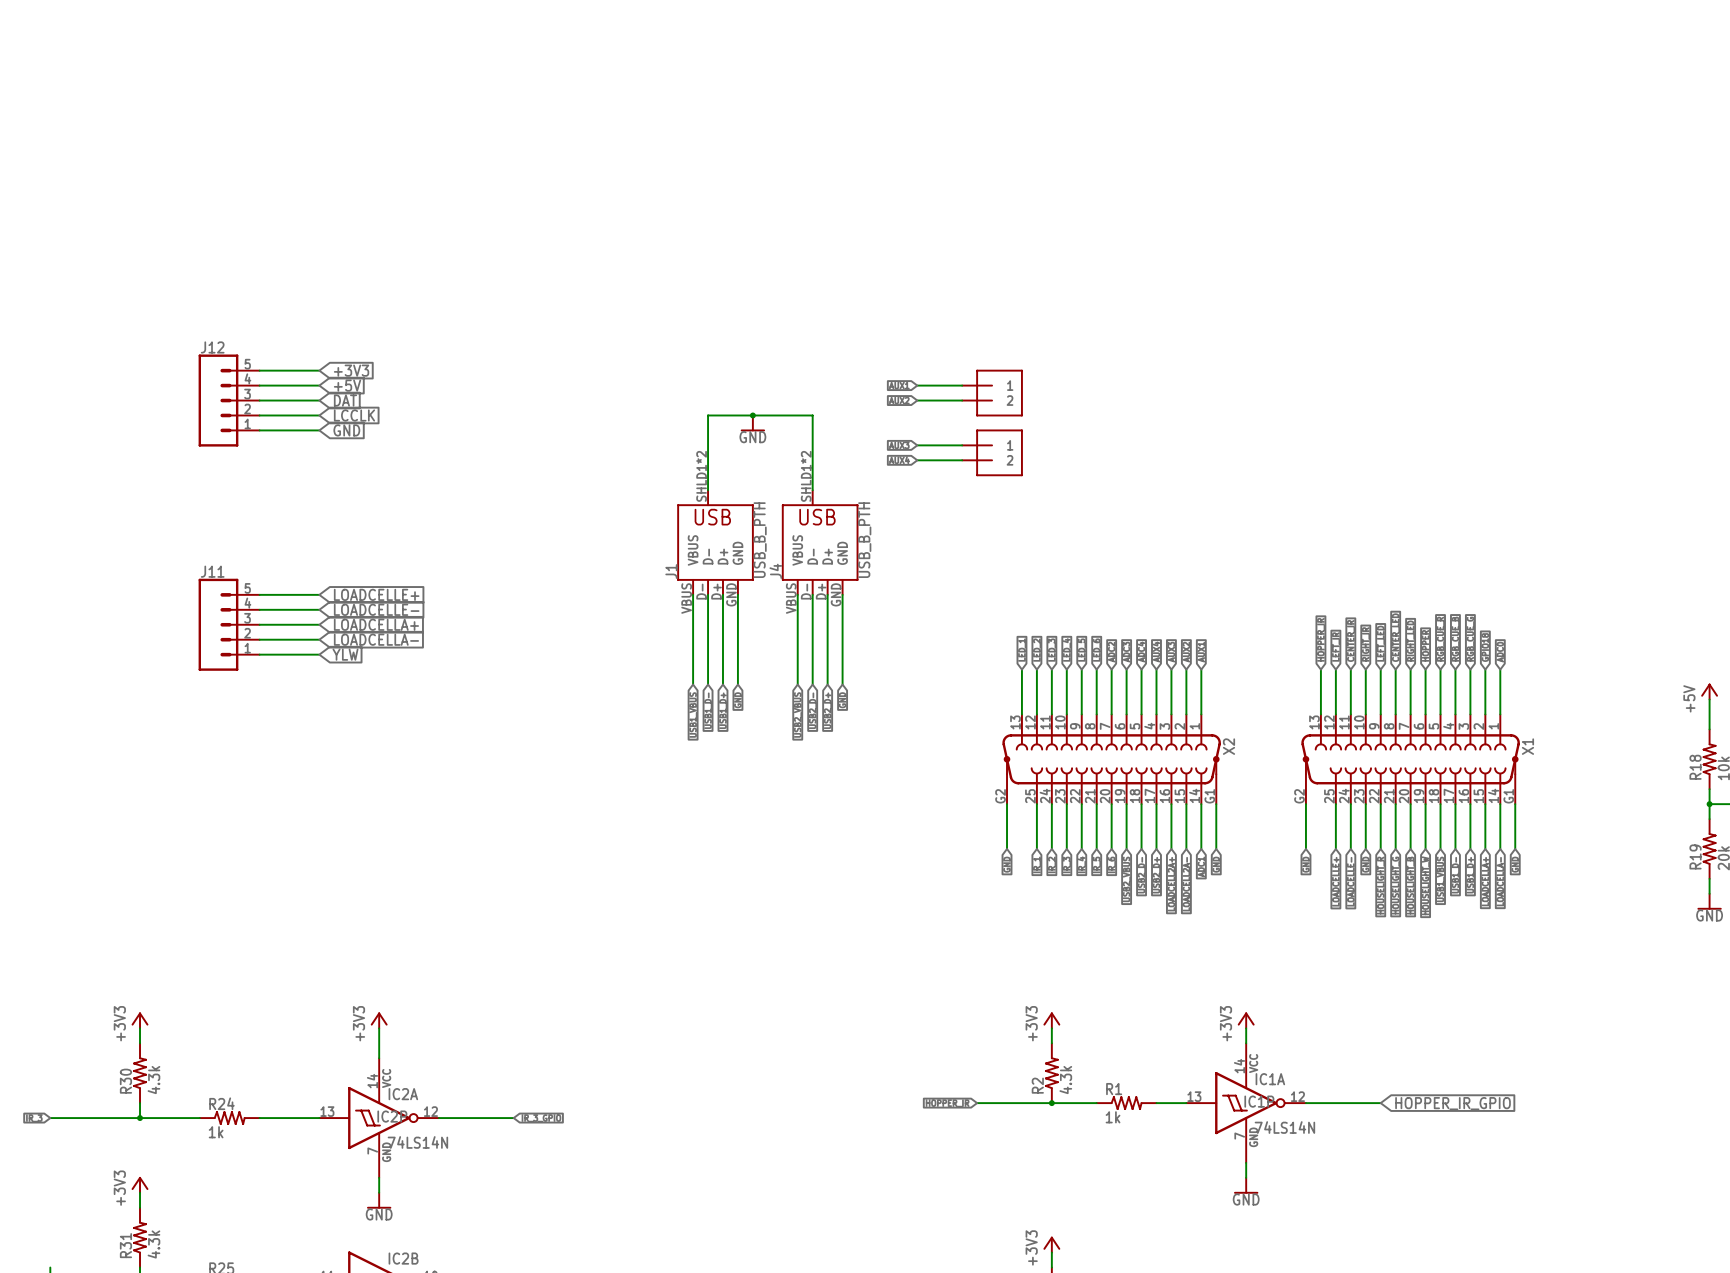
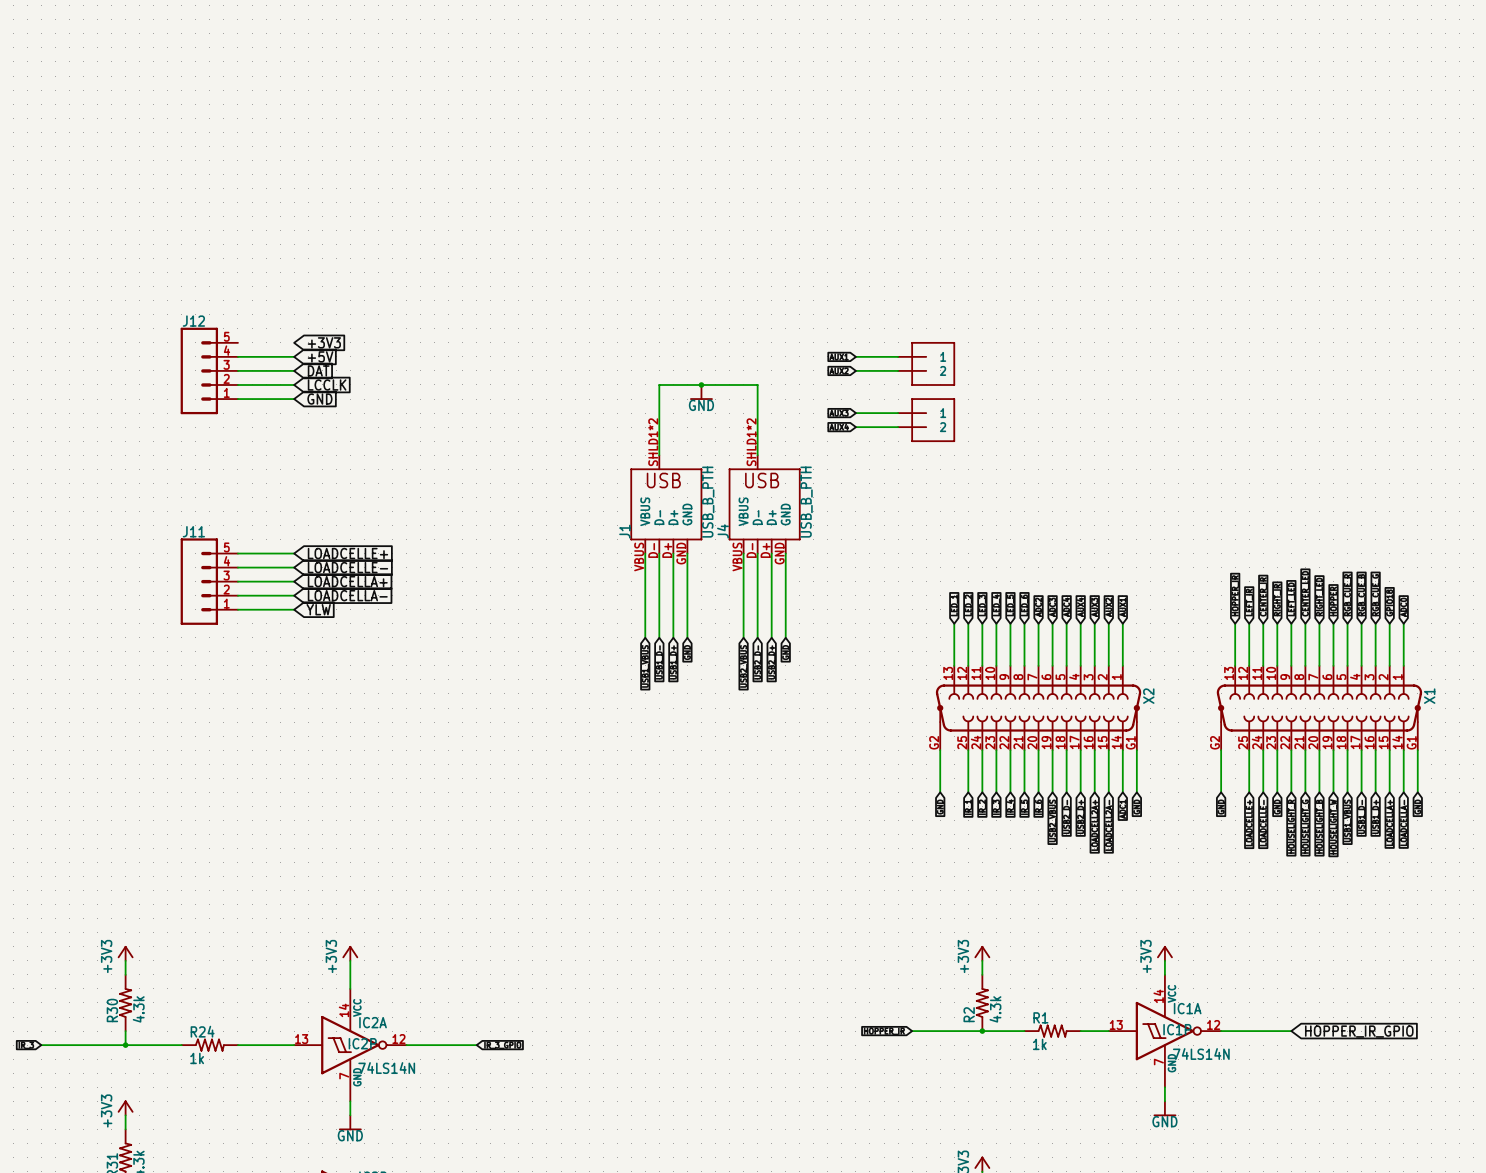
wire: (259, 370) (319, 370) -> none

